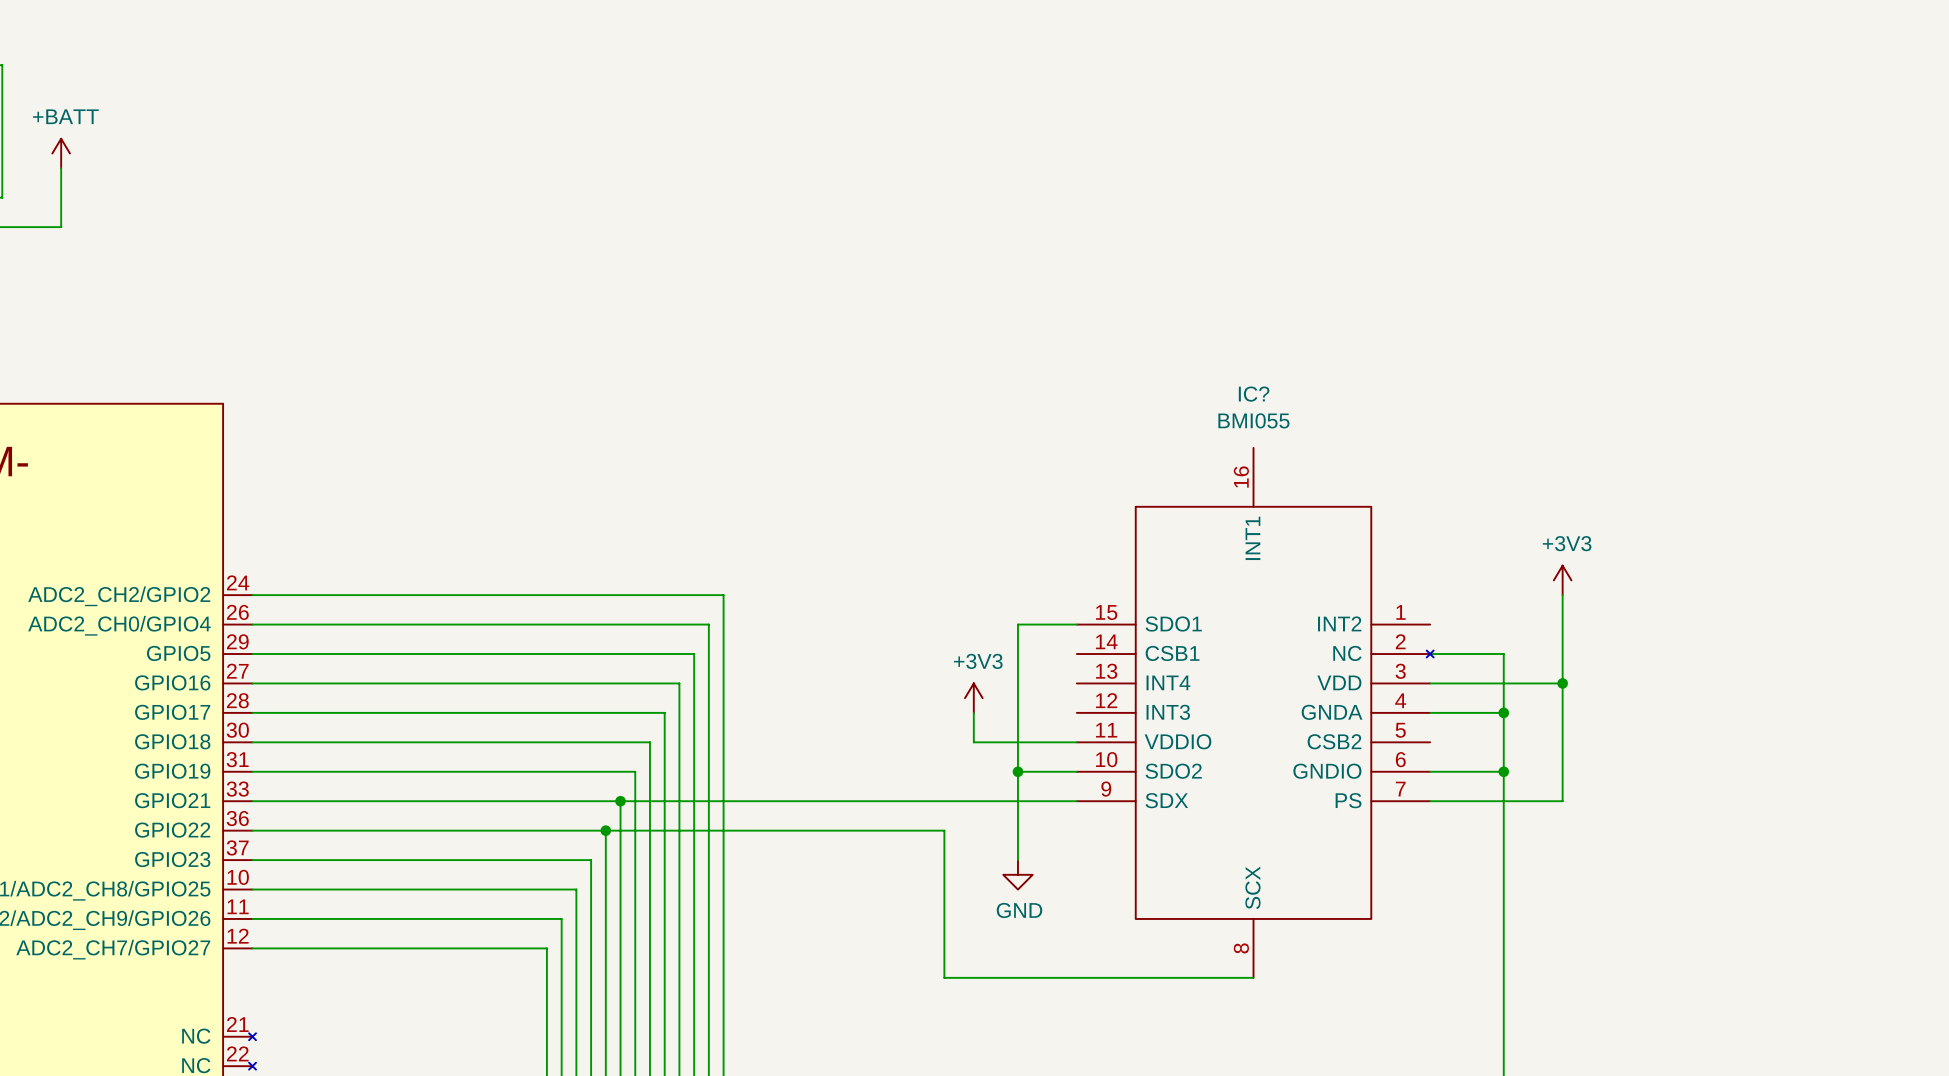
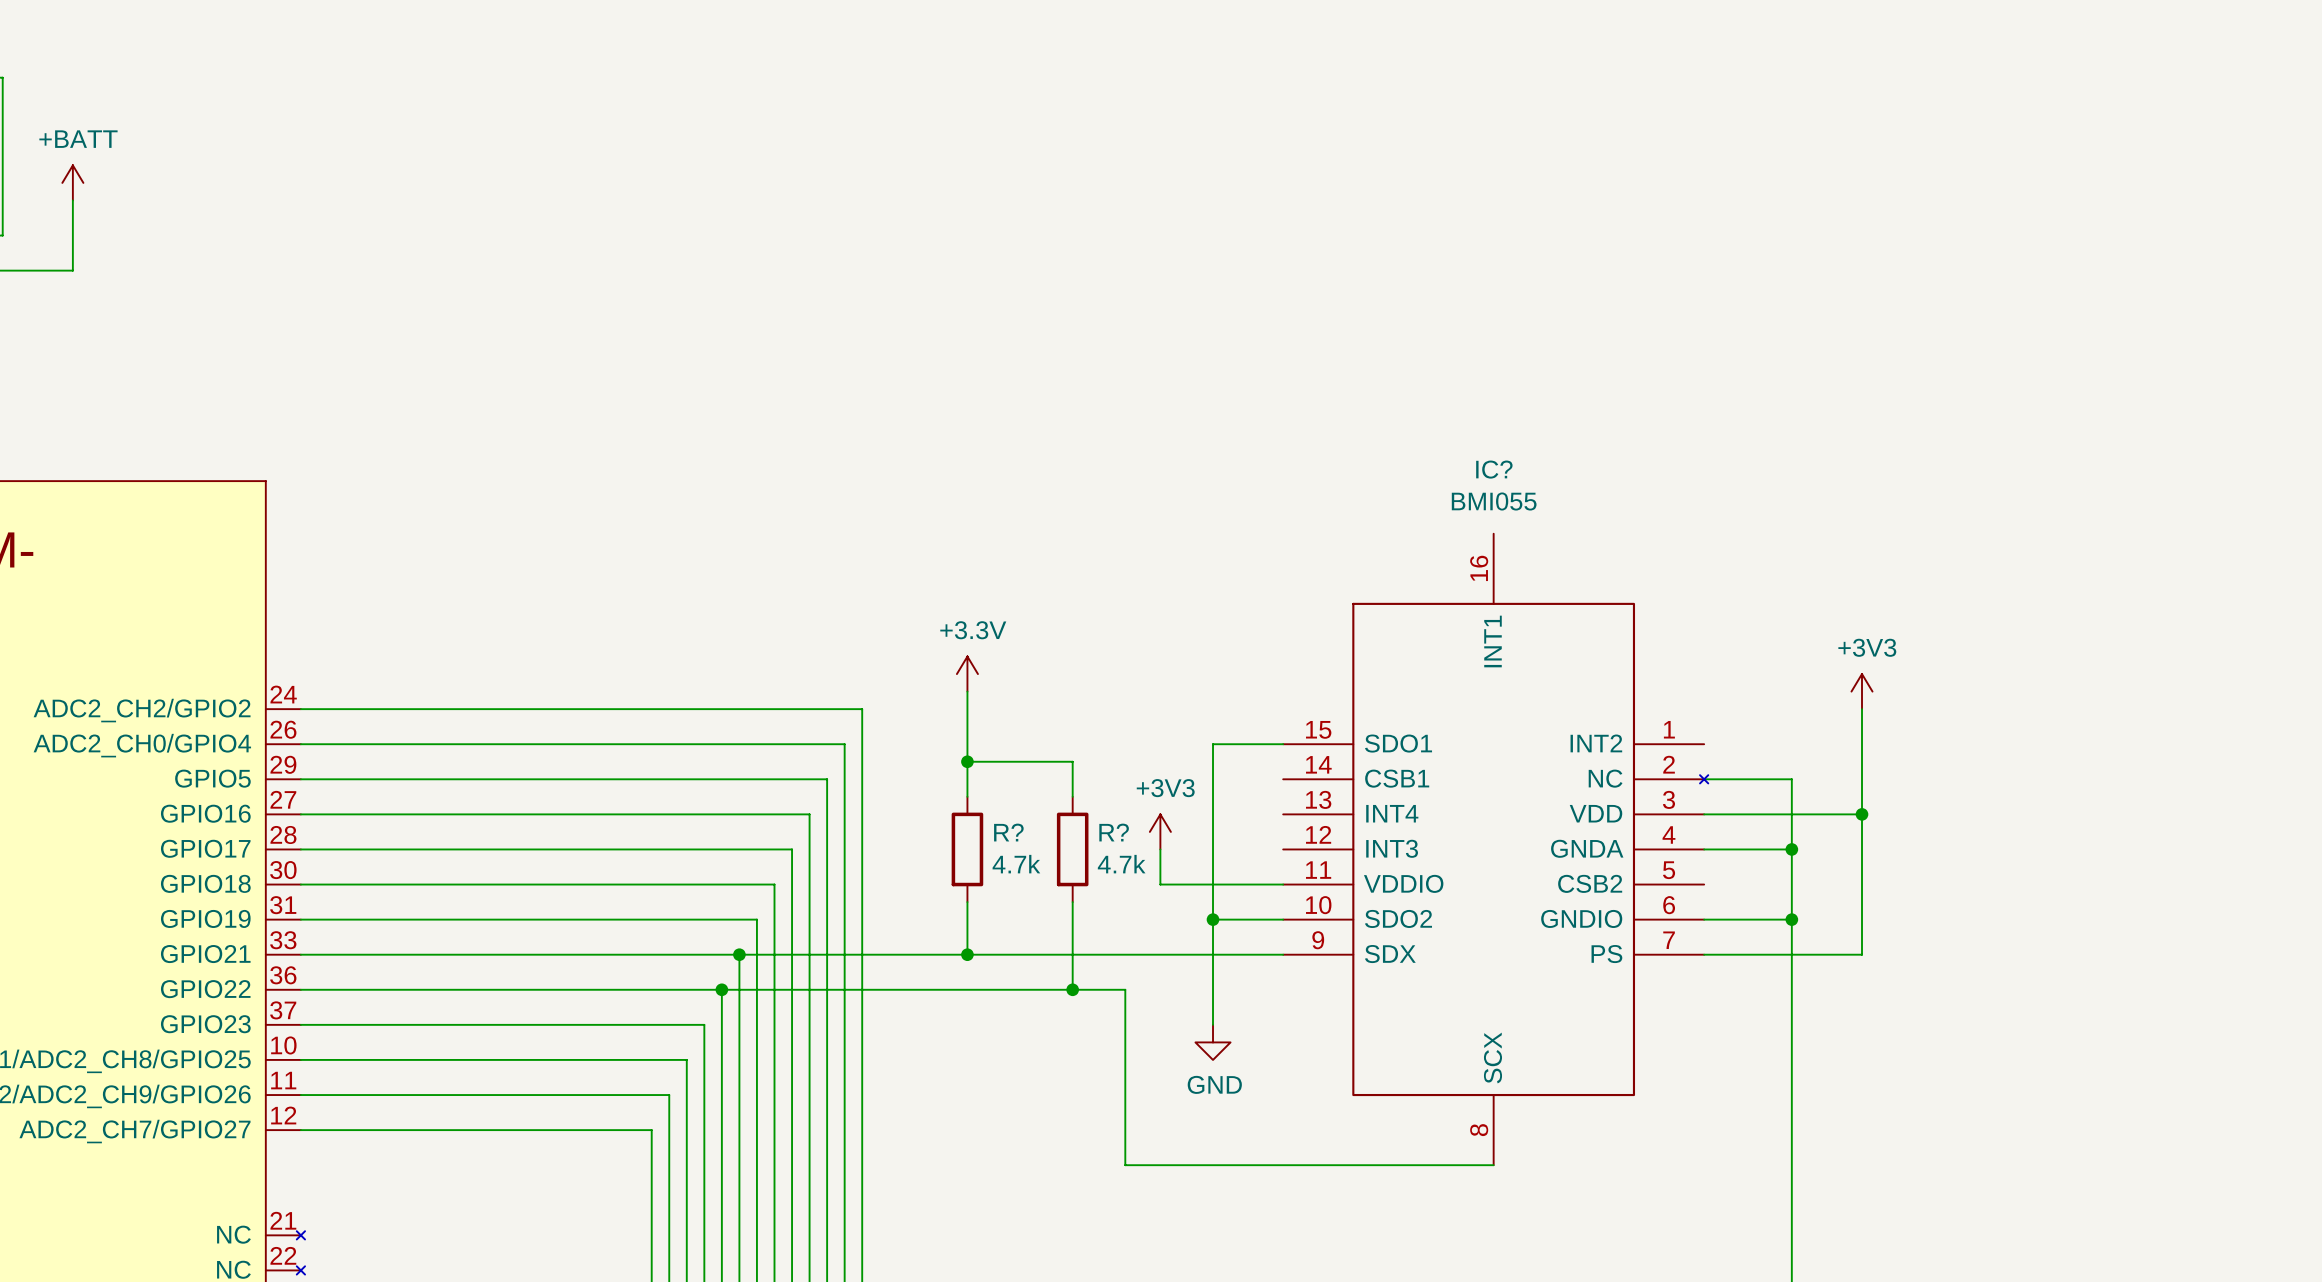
power symbol: none -> +3.3V (967, 674)
wire: none -> (967, 691) (967, 796)
wire: none -> (967, 761) (1072, 761) (1072, 796)
junction: none -> (967, 761)
R?: none -> 4.7k (967, 849)
R?: none -> 4.7k (1072, 849)
wire: none -> (967, 902) (967, 954)
wire: none -> (1072, 902) (1072, 989)
junction: none -> (967, 954)
junction: none -> (1072, 989)

